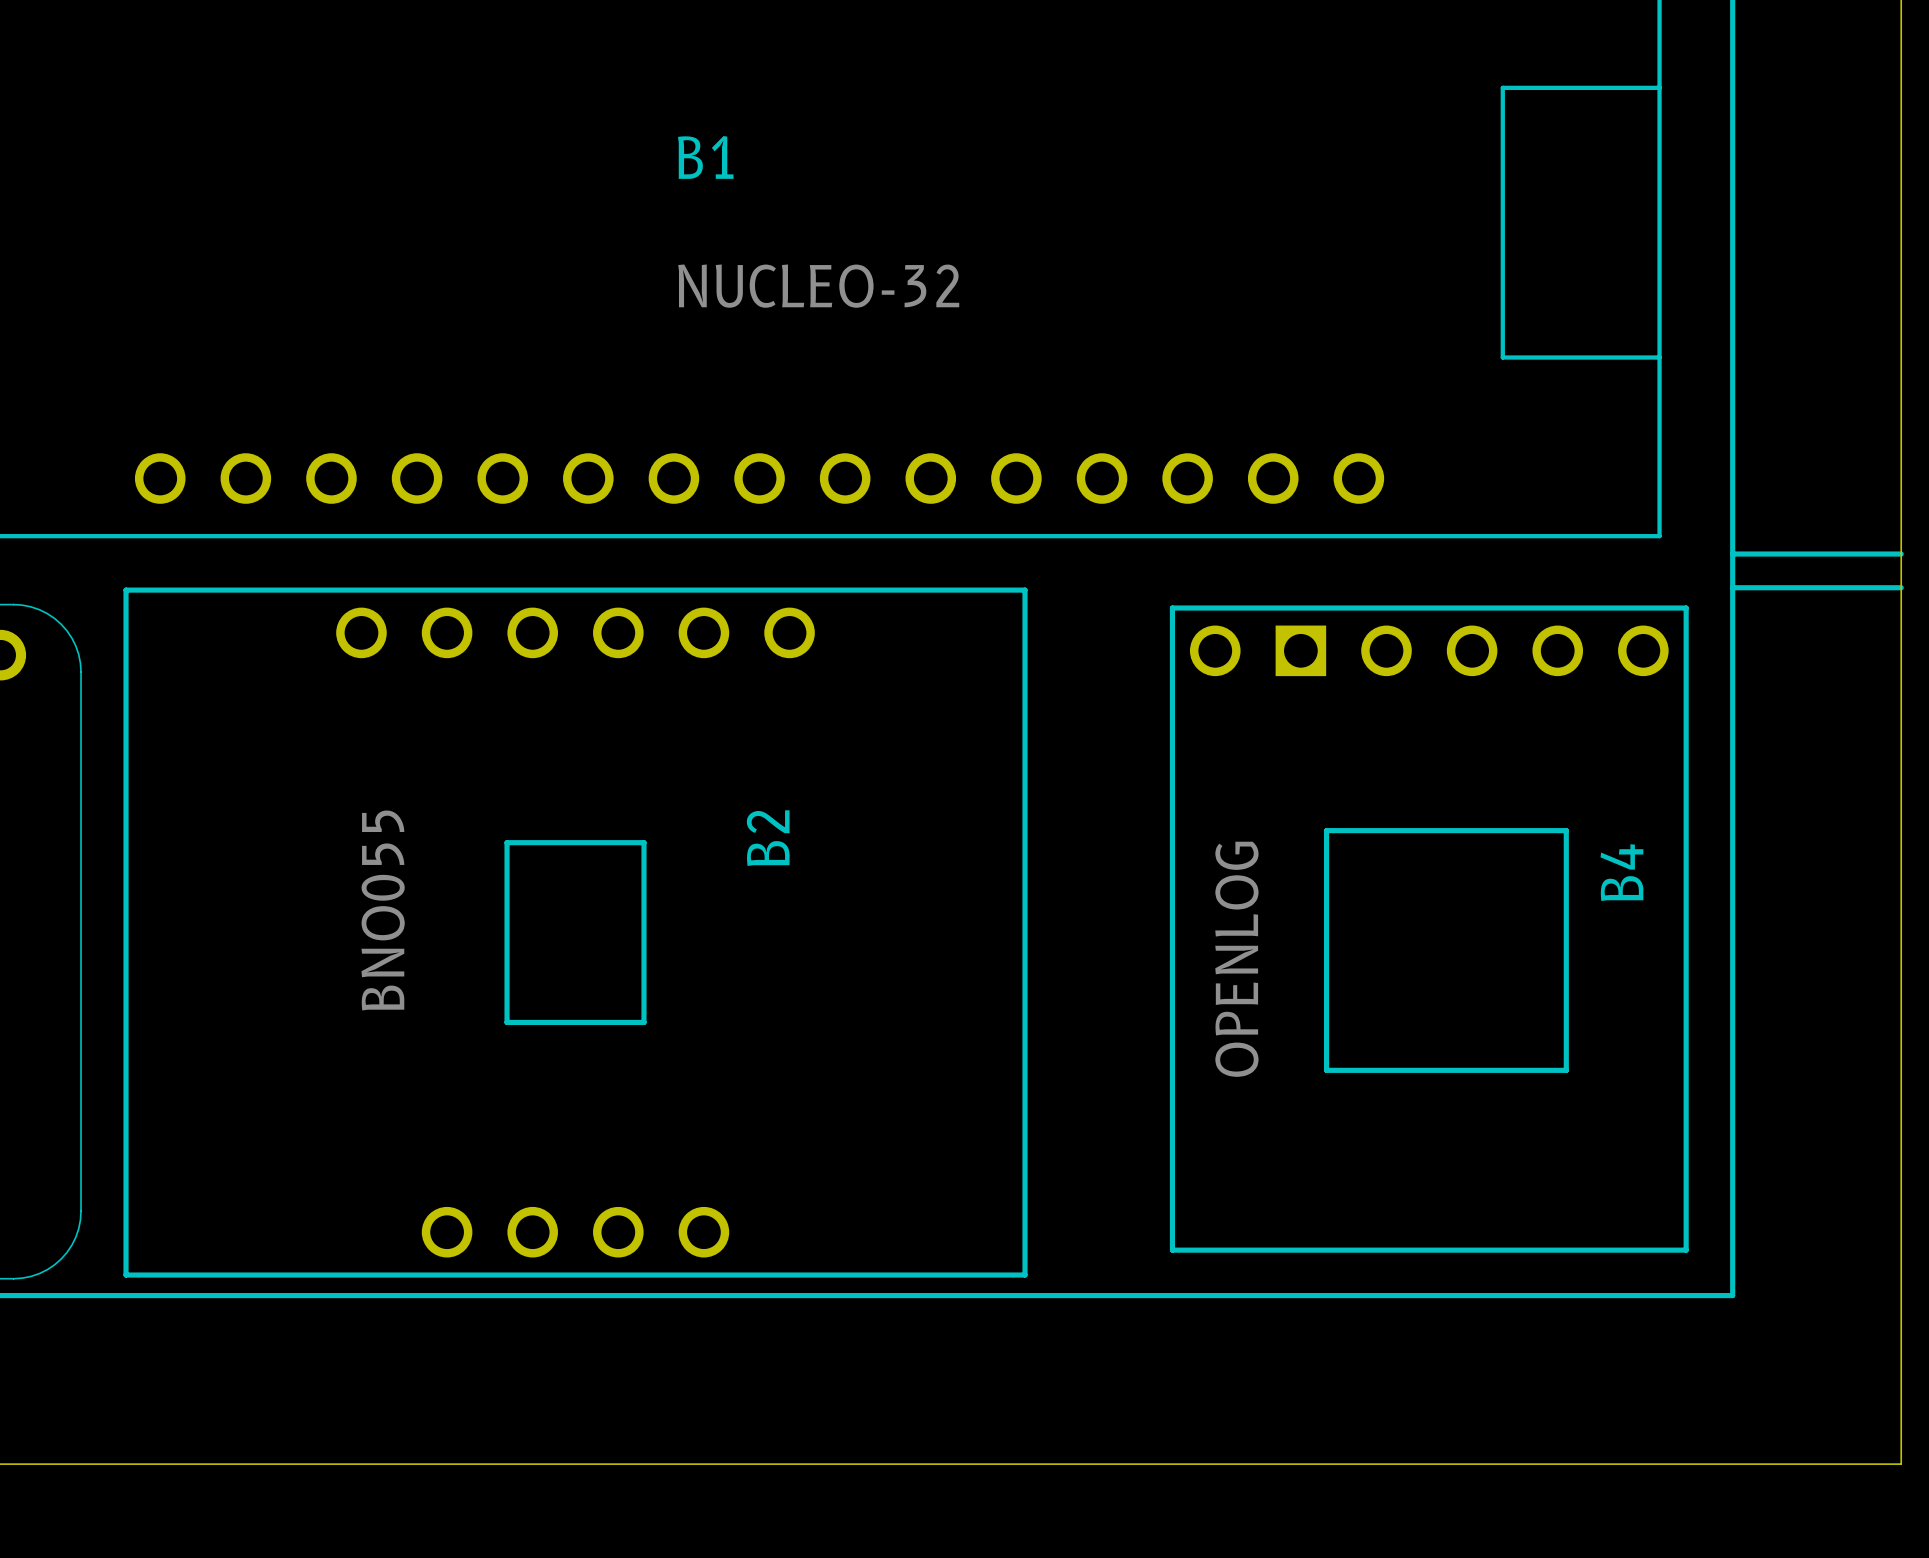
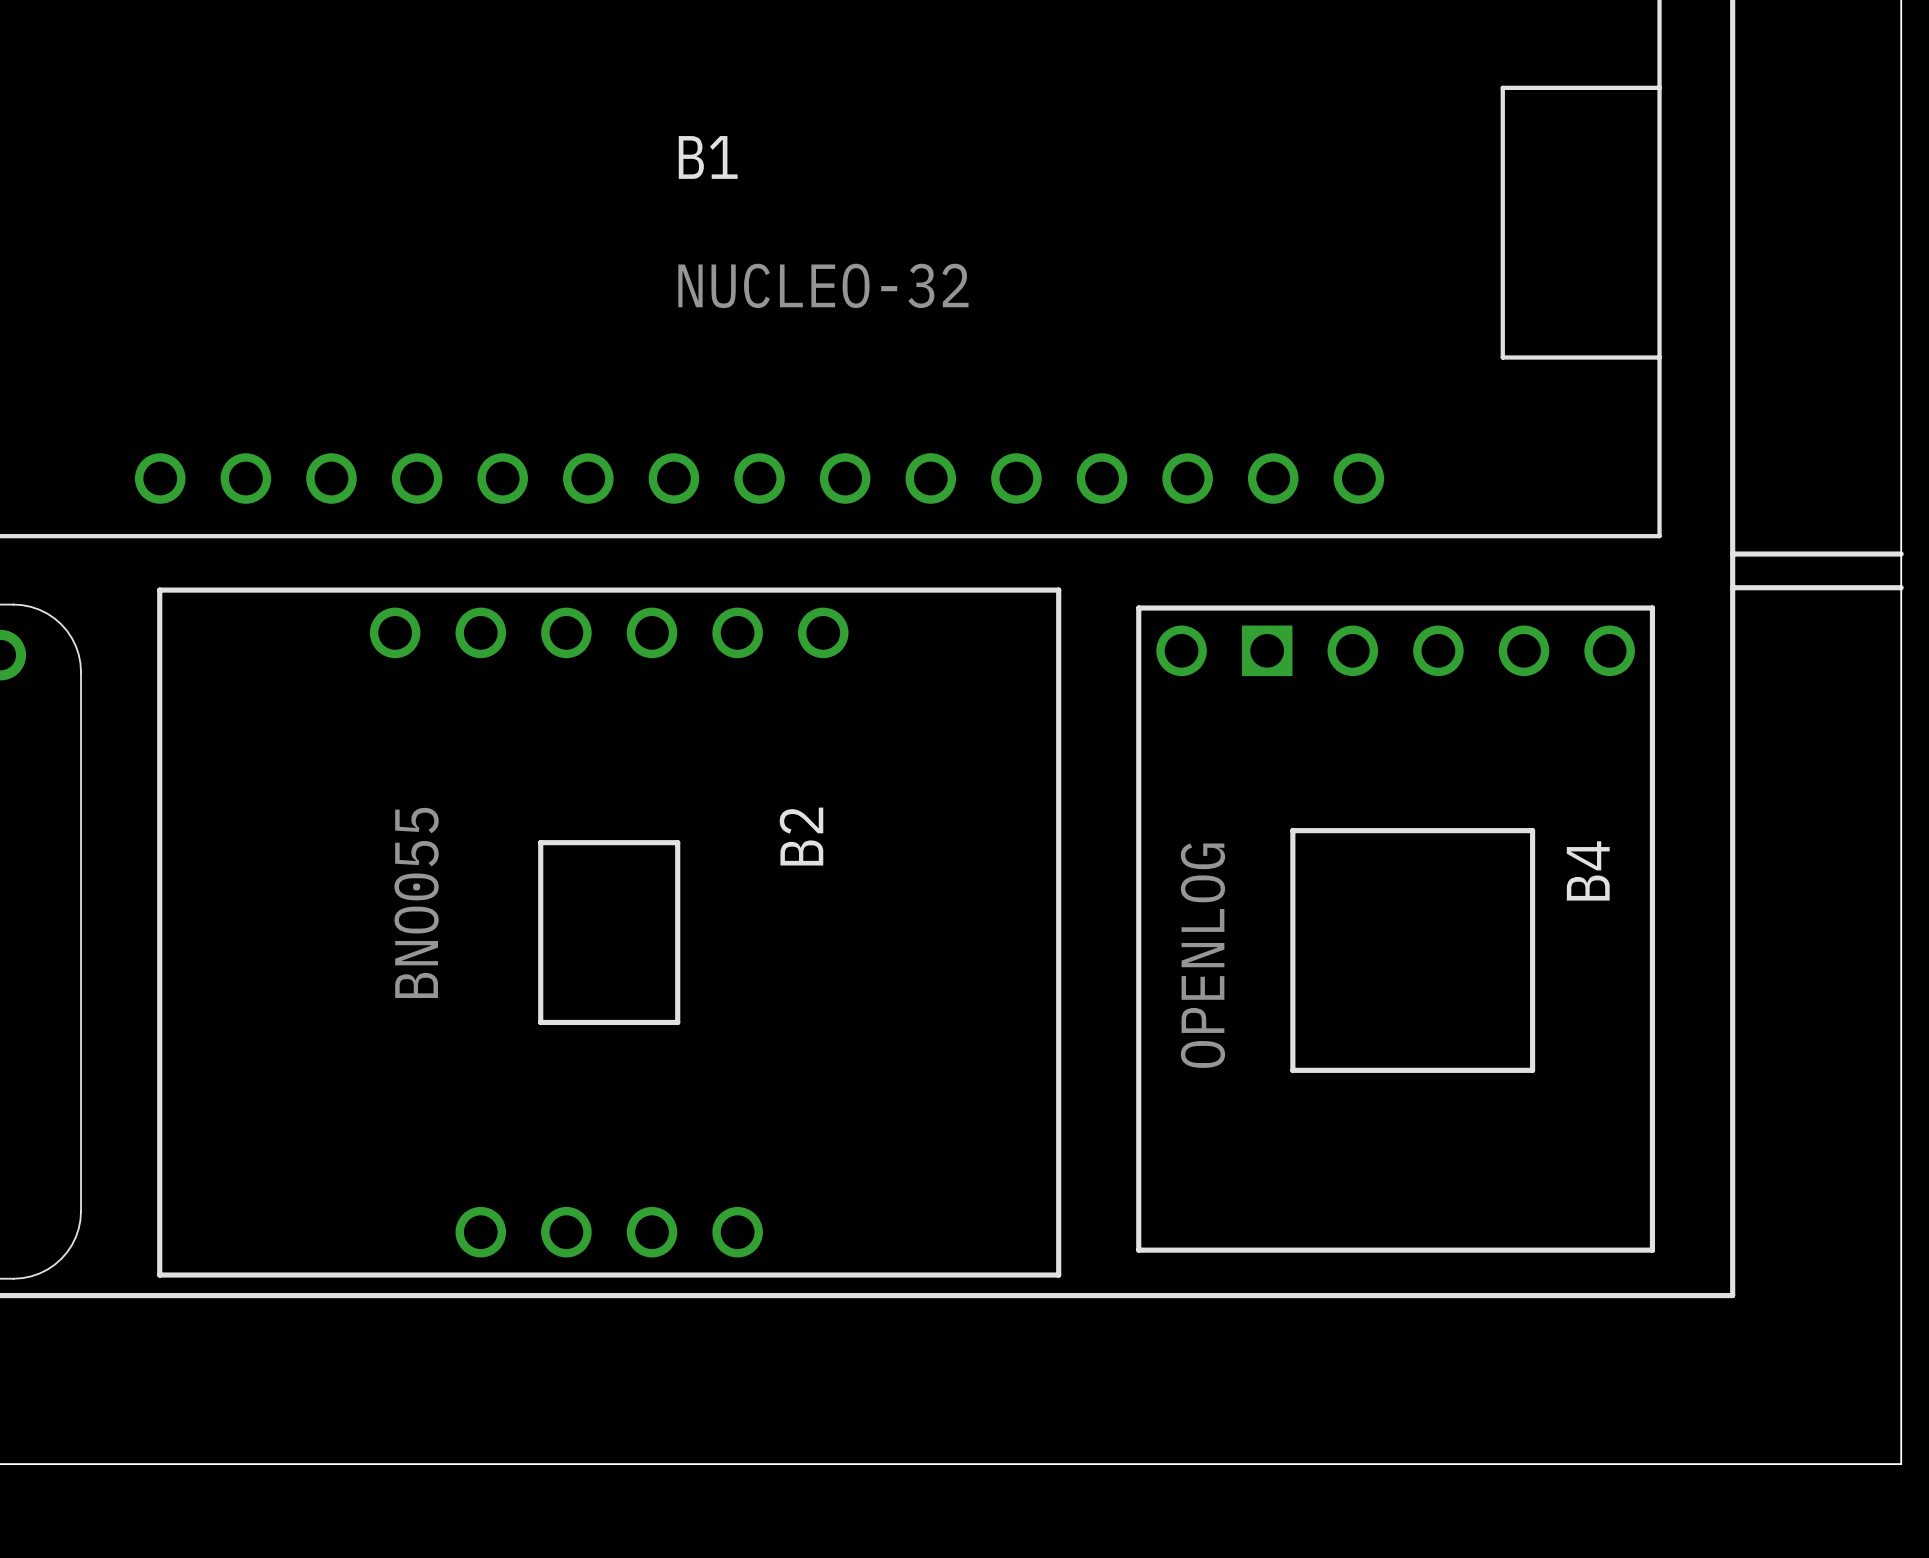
B4 position: (1429, 929) -> (1395, 929)
B2 position: (575, 932) -> (609, 932)

